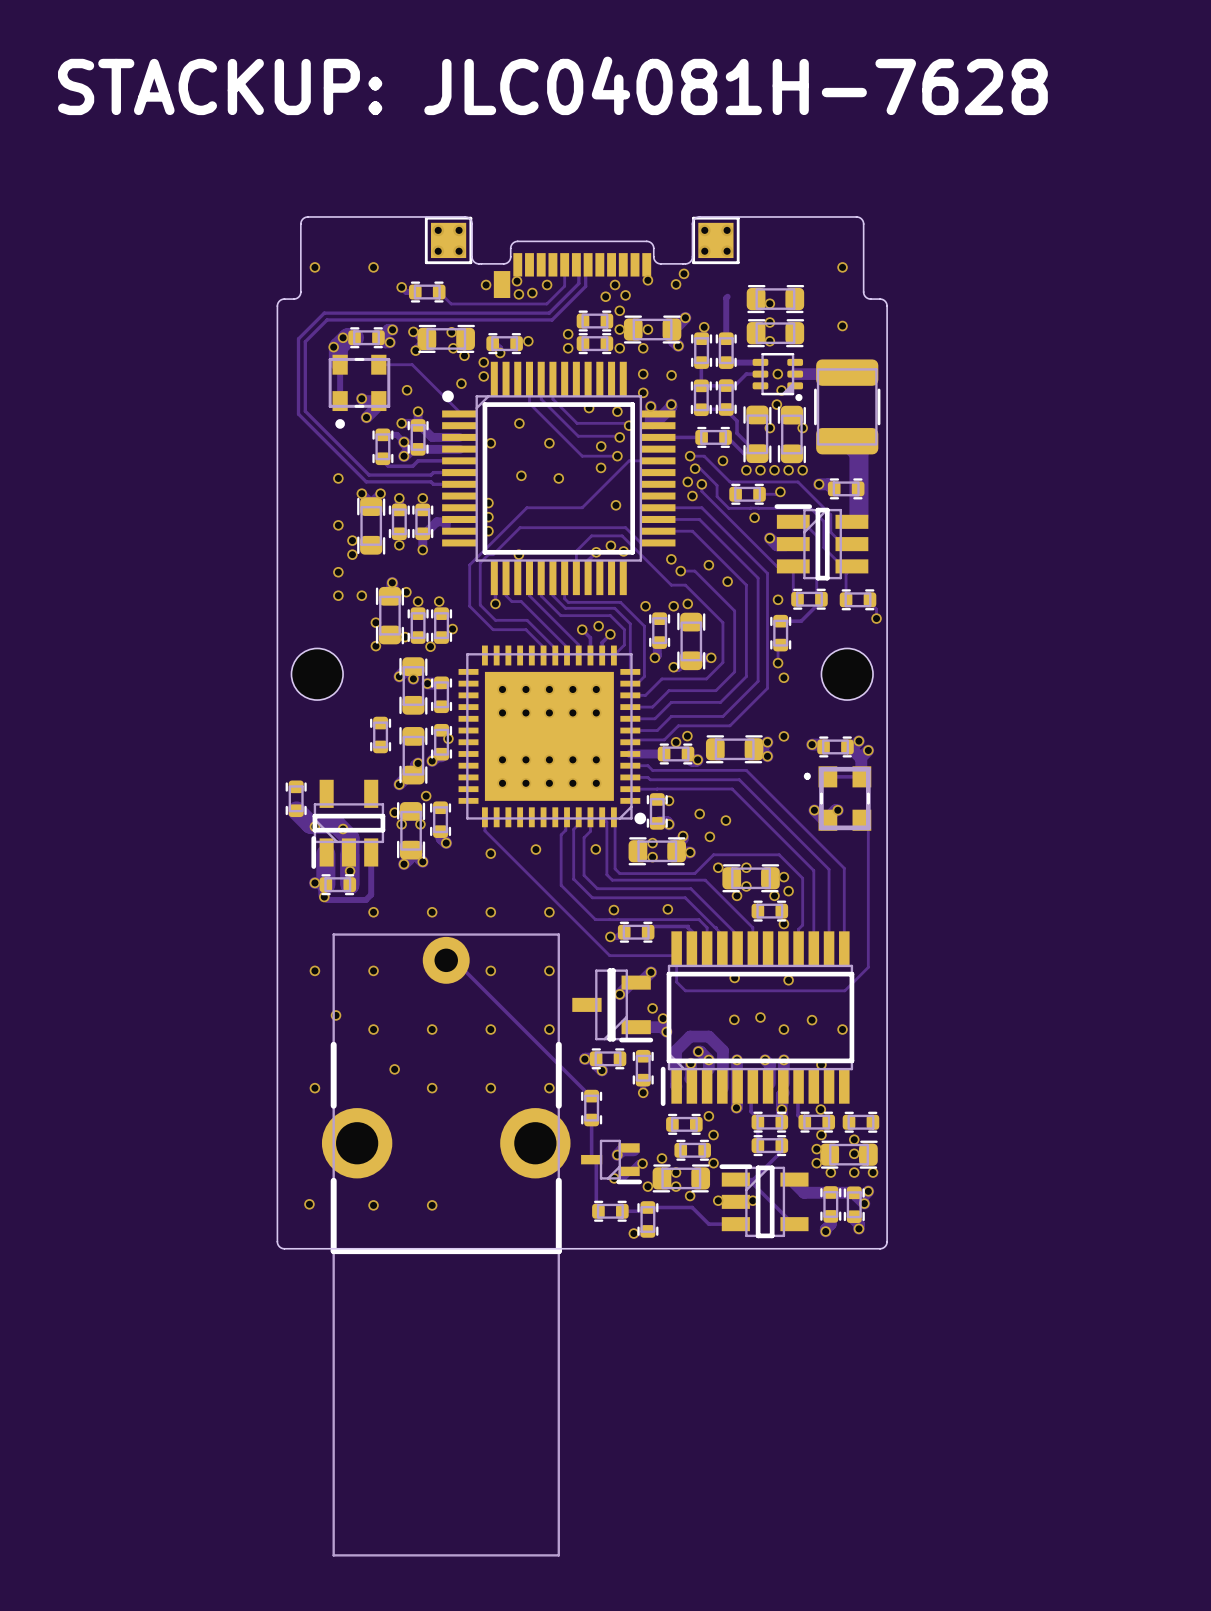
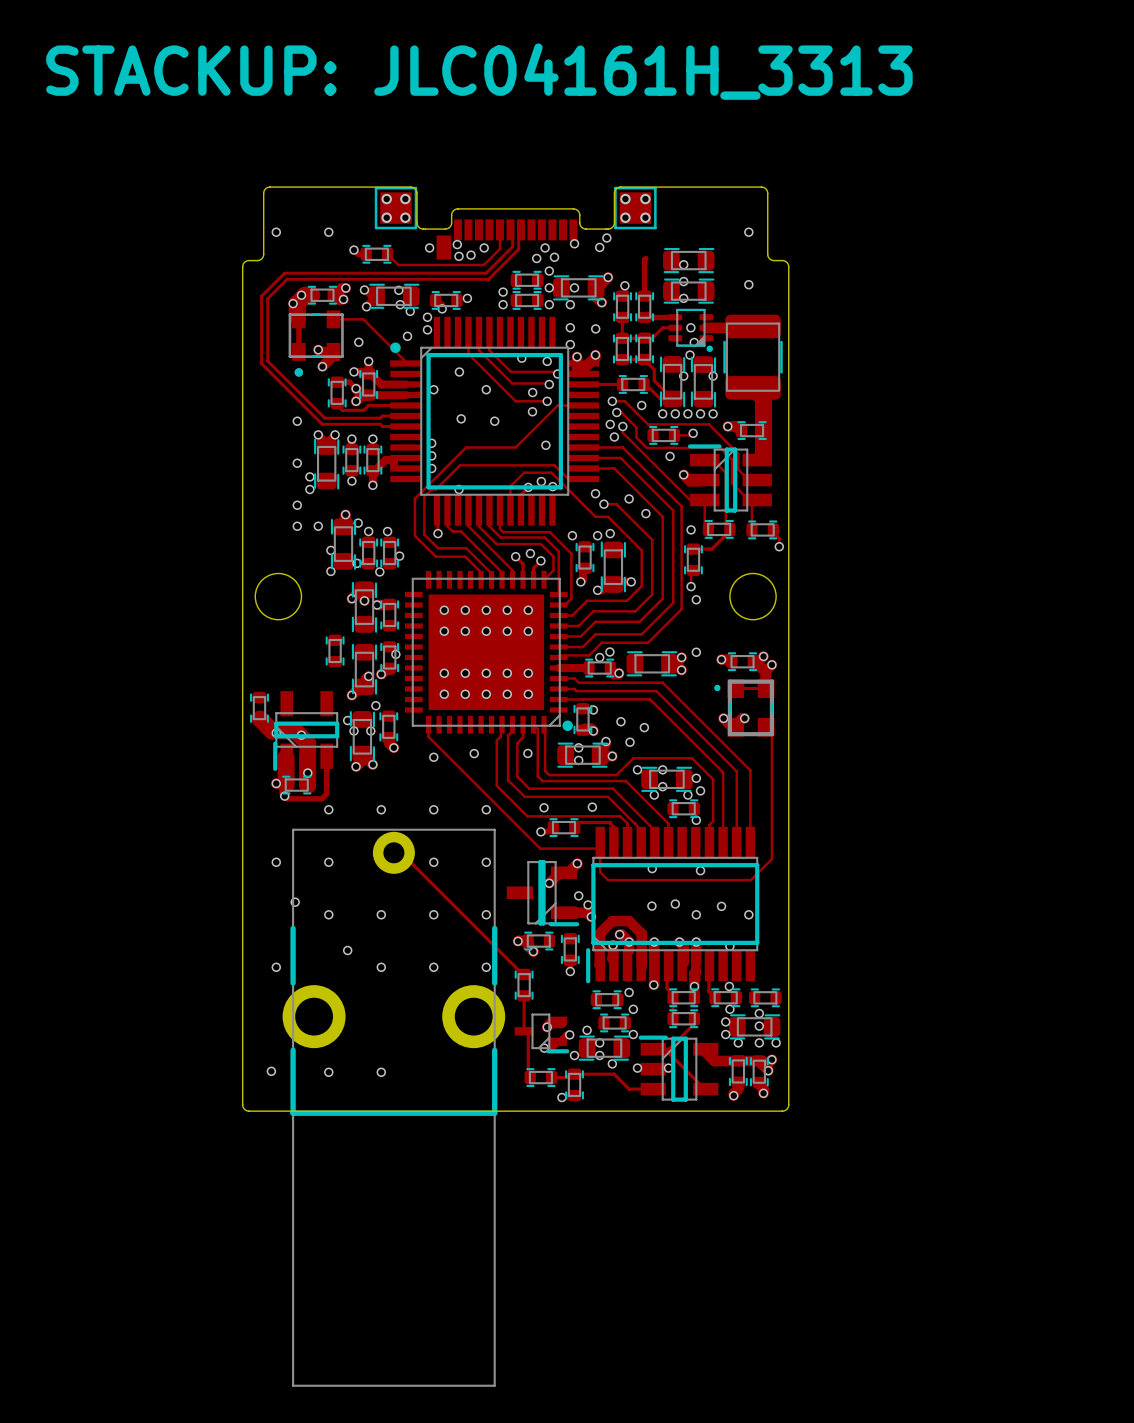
text: STACKUP: JLC04081H-7628 (552, 85) -> STACKUP: JLC04161H_3313 (479, 71)

